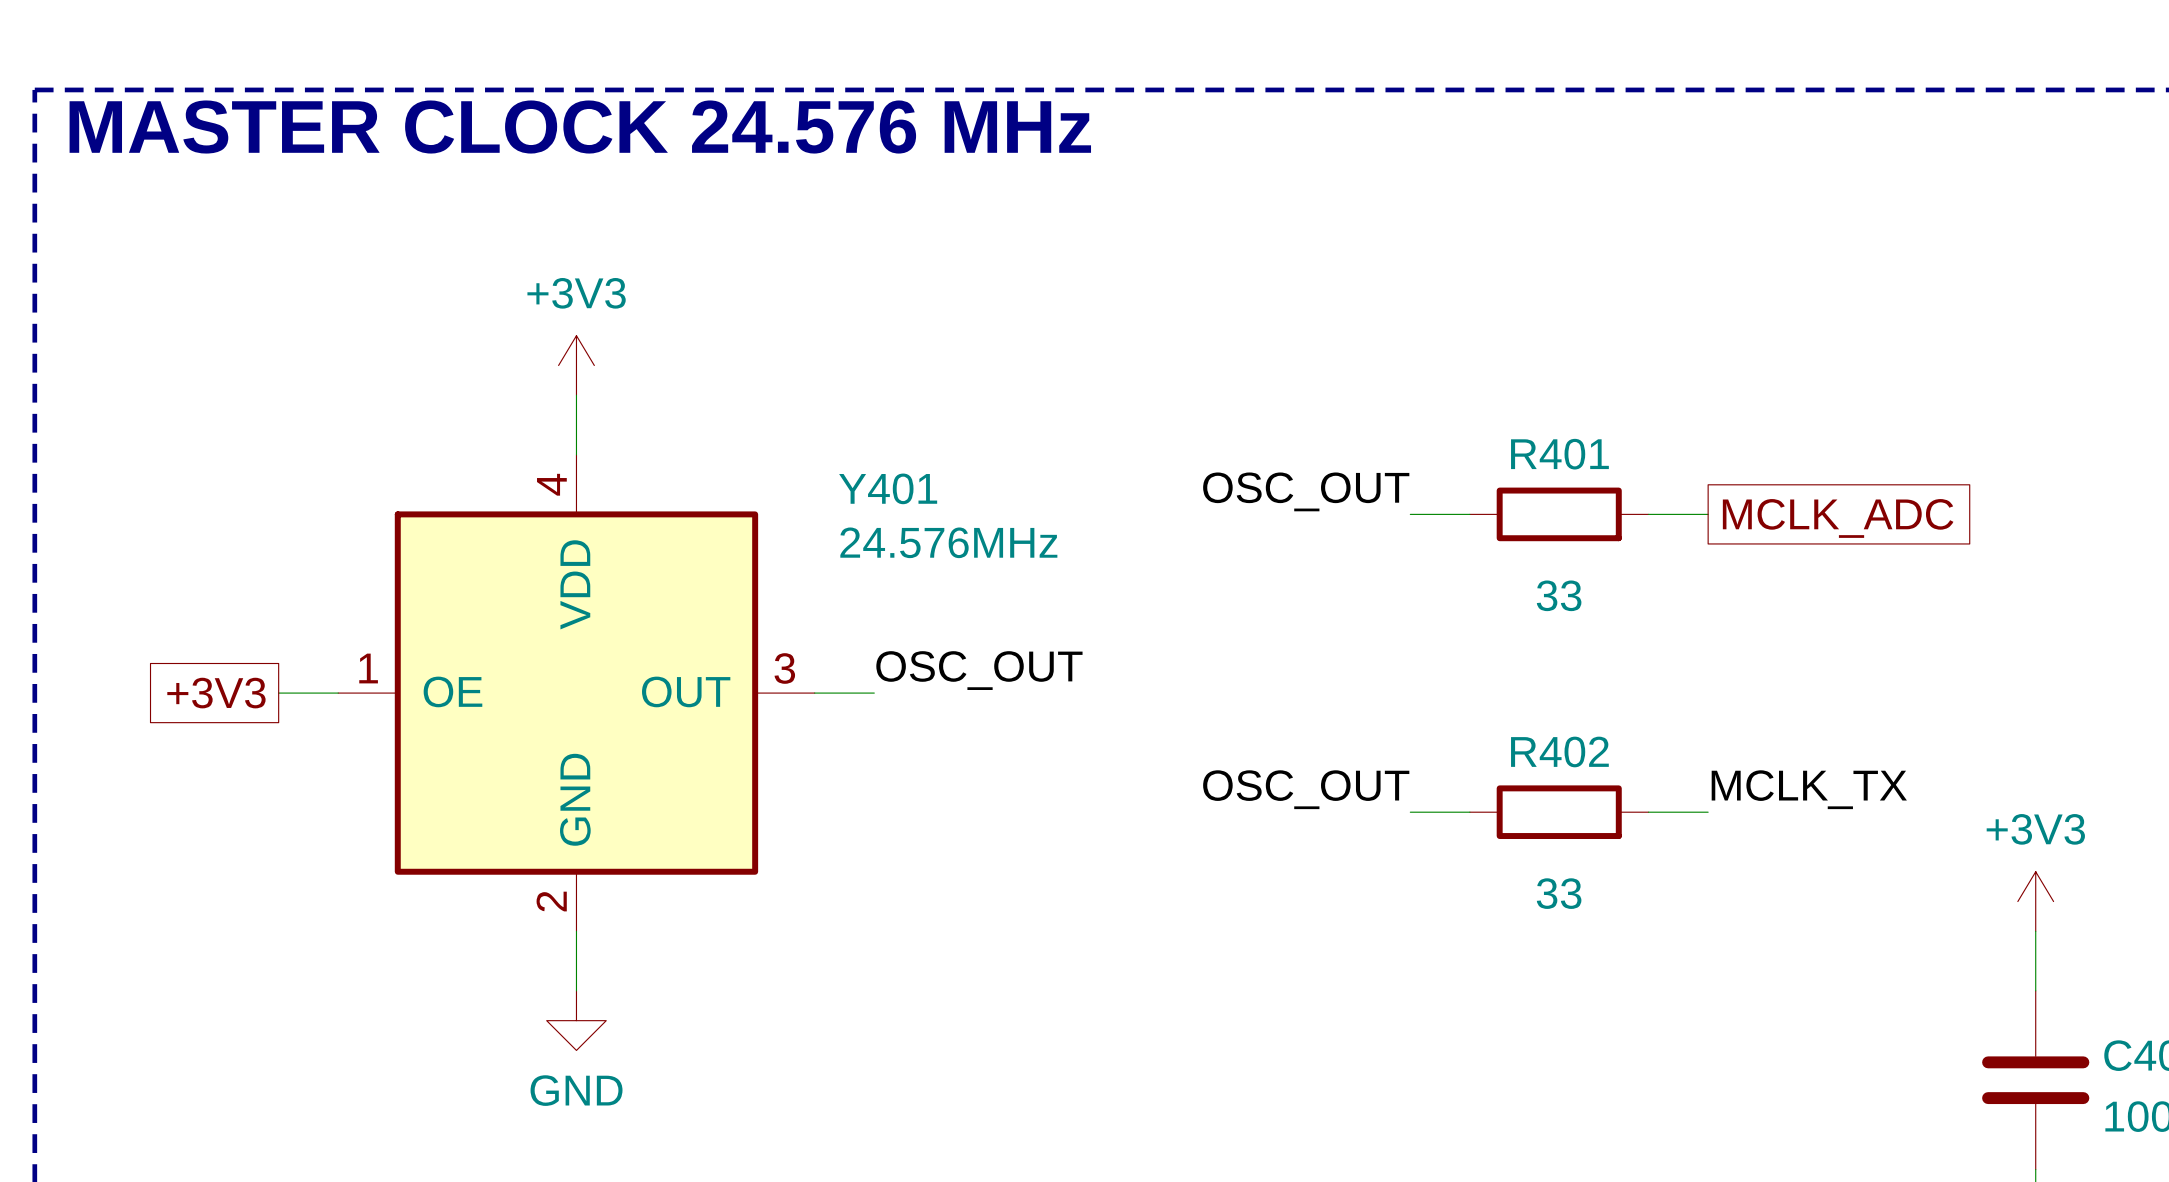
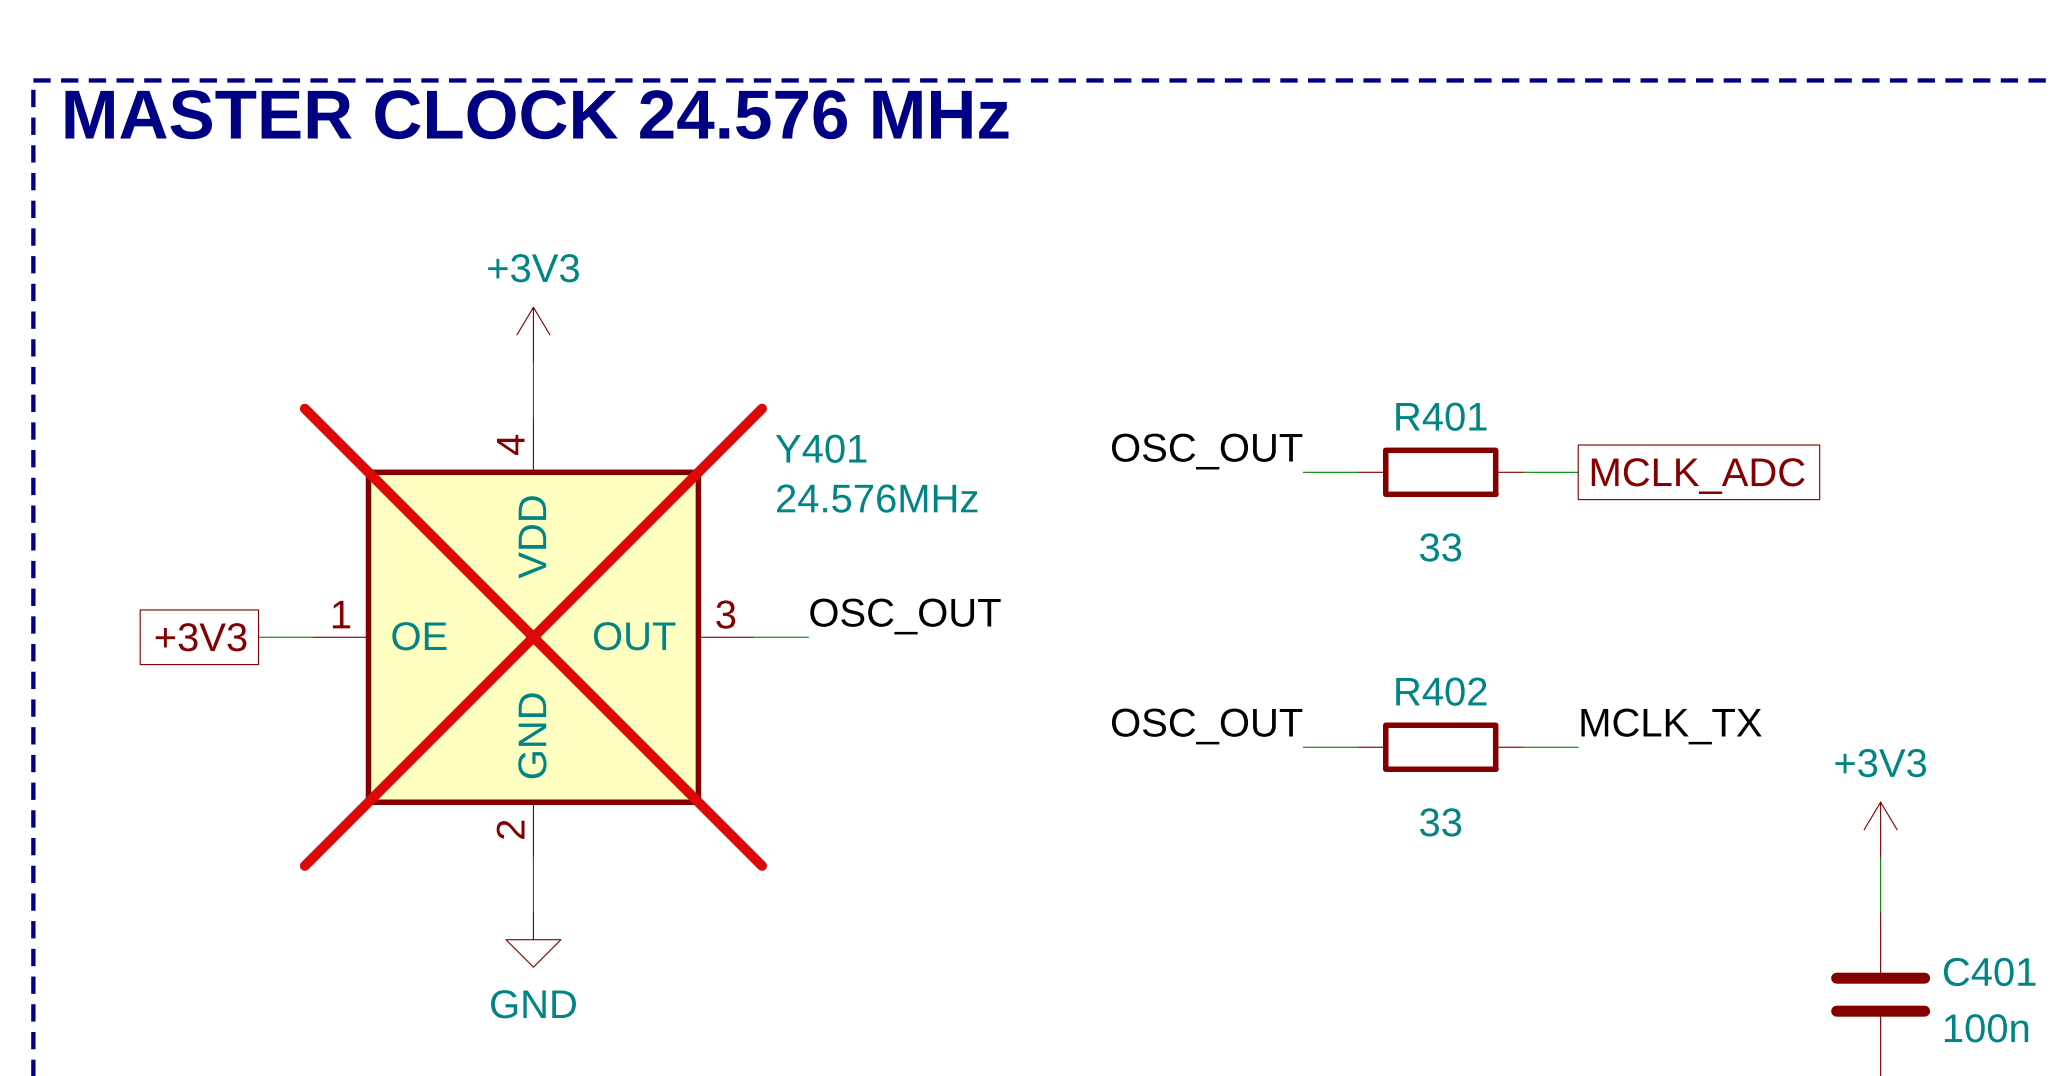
Y401 do-not-place cross: none -> (533, 637)

